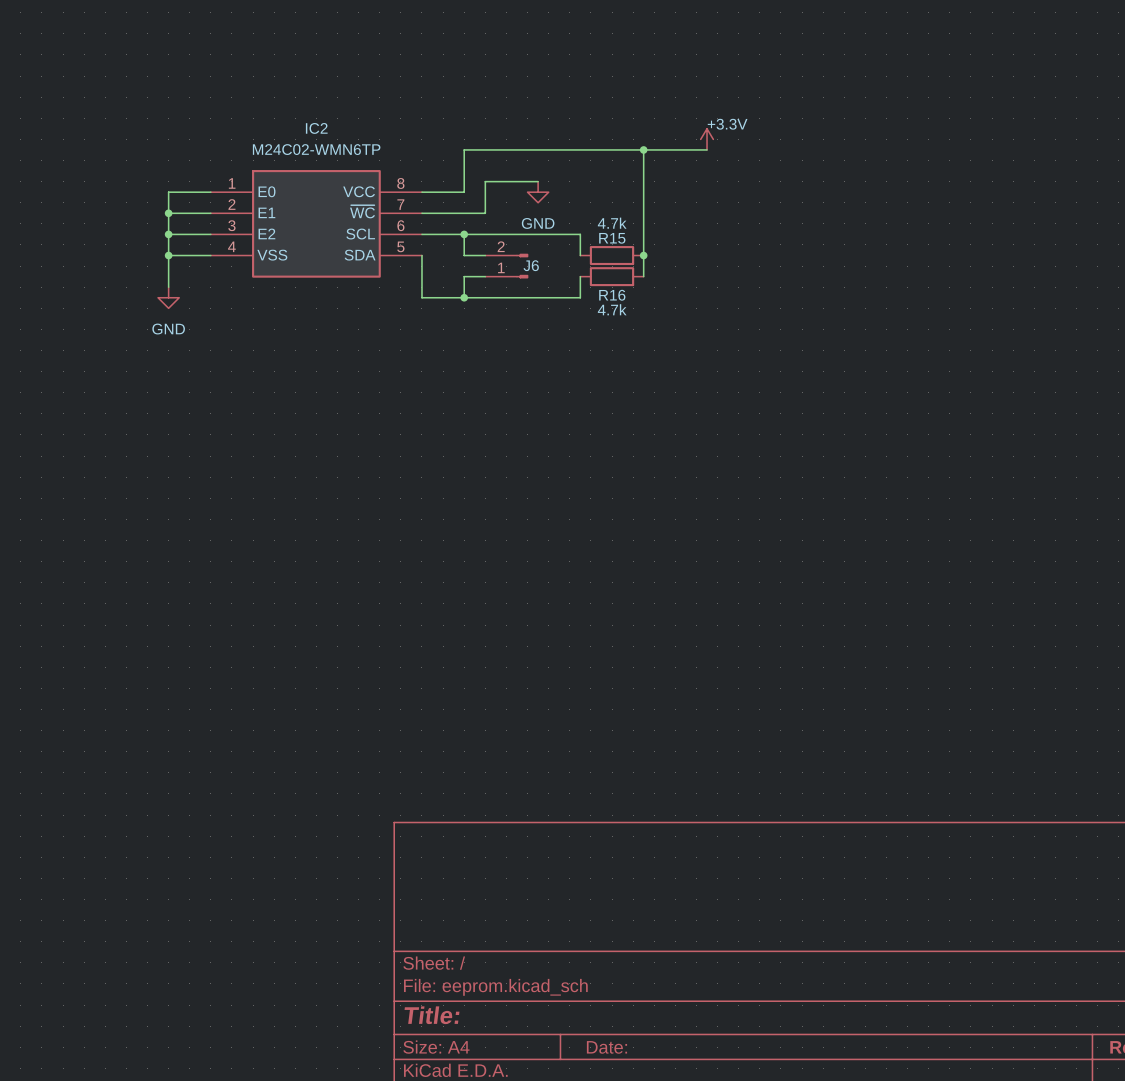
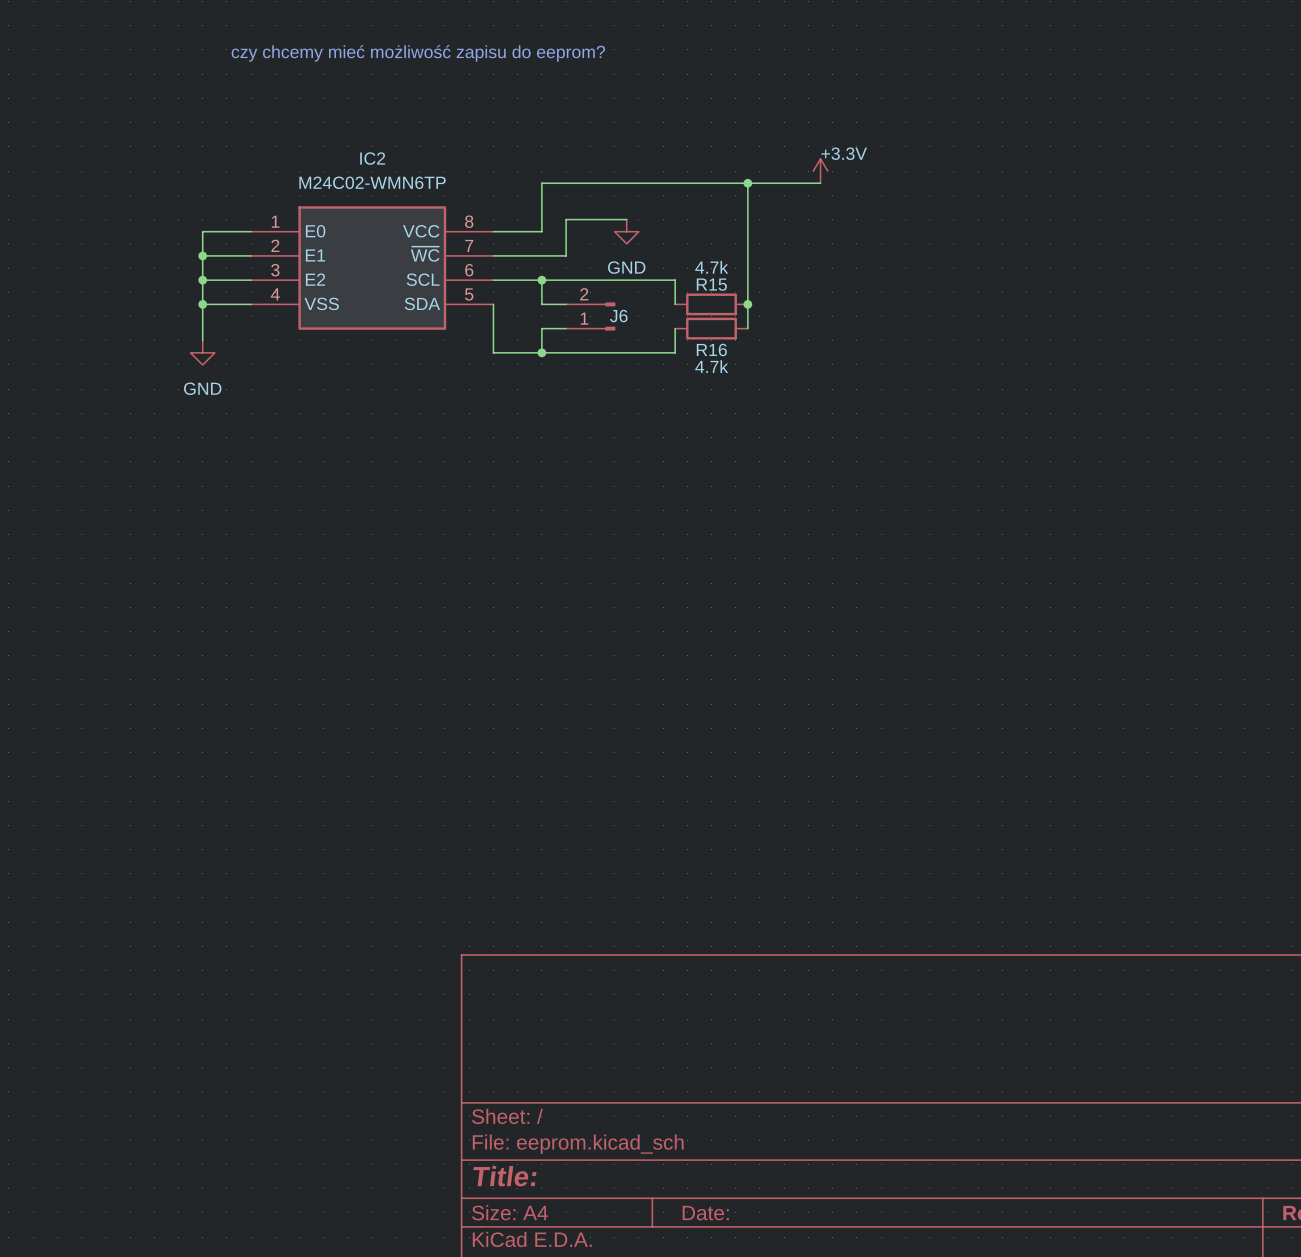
text: none -> czy chcemy mieć możliwość zapisu do eeprom? (418, 53)

